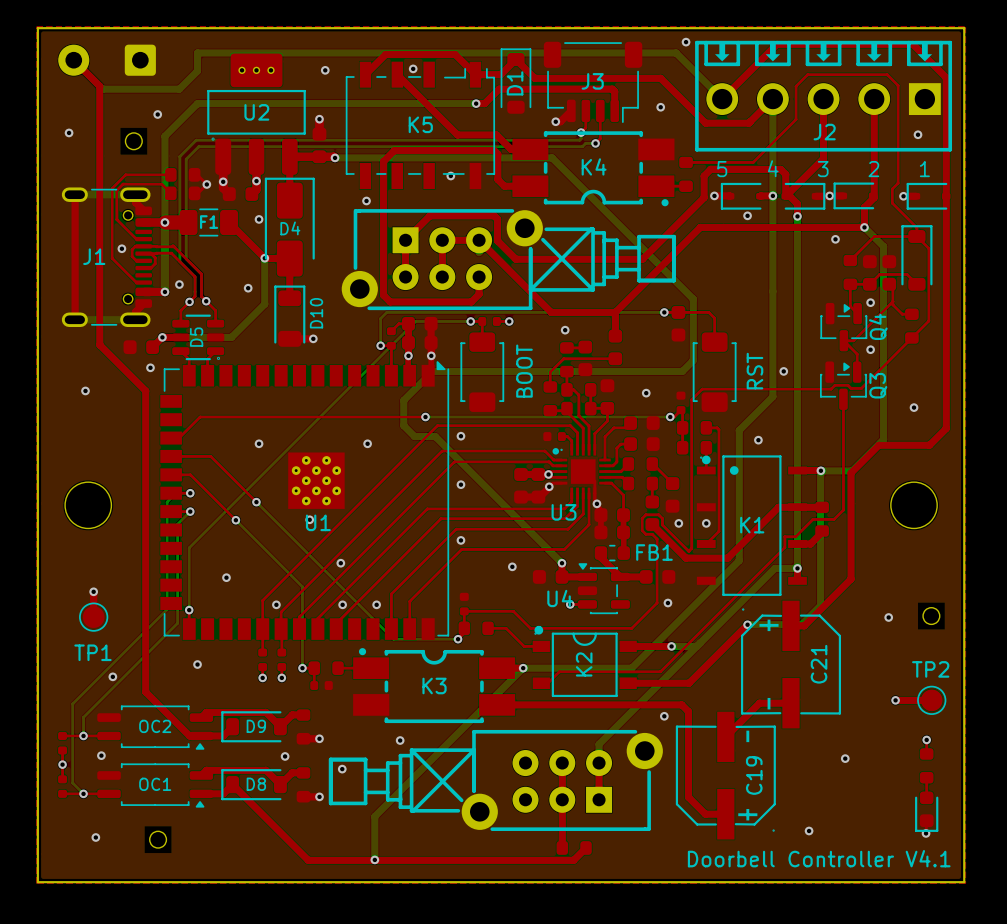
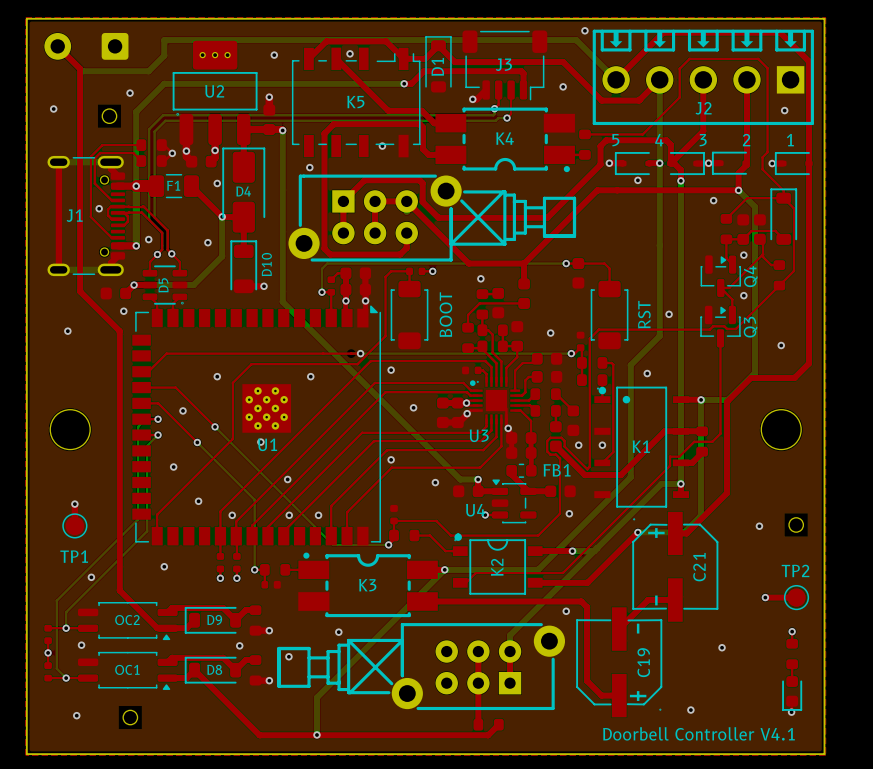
bottom track: (335, 157) (552, 157) (693, 299) (693, 360) (682, 371) (432, 371) (403, 400) (403, 425) -> (282, 130) (282, 301) (341, 361)
top track: none -> (399, 271) (391, 271) (385, 276) (385, 336) (357, 364) (251, 364) (232, 382) (232, 438) (157, 514) (157, 519)
bottom track: (470, 321) (415, 321) (189, 547) (189, 610) -> none
via: (470, 321) -> none
bottom track: (414, 436) (435, 436) (561, 563) -> (351, 370) (460, 479) (478, 479)
via: none -> (183, 410)
via position: (460, 484) -> (413, 407)
via: none -> (173, 467)
via position: (226, 577) -> (198, 501)
via: (189, 610) -> none

